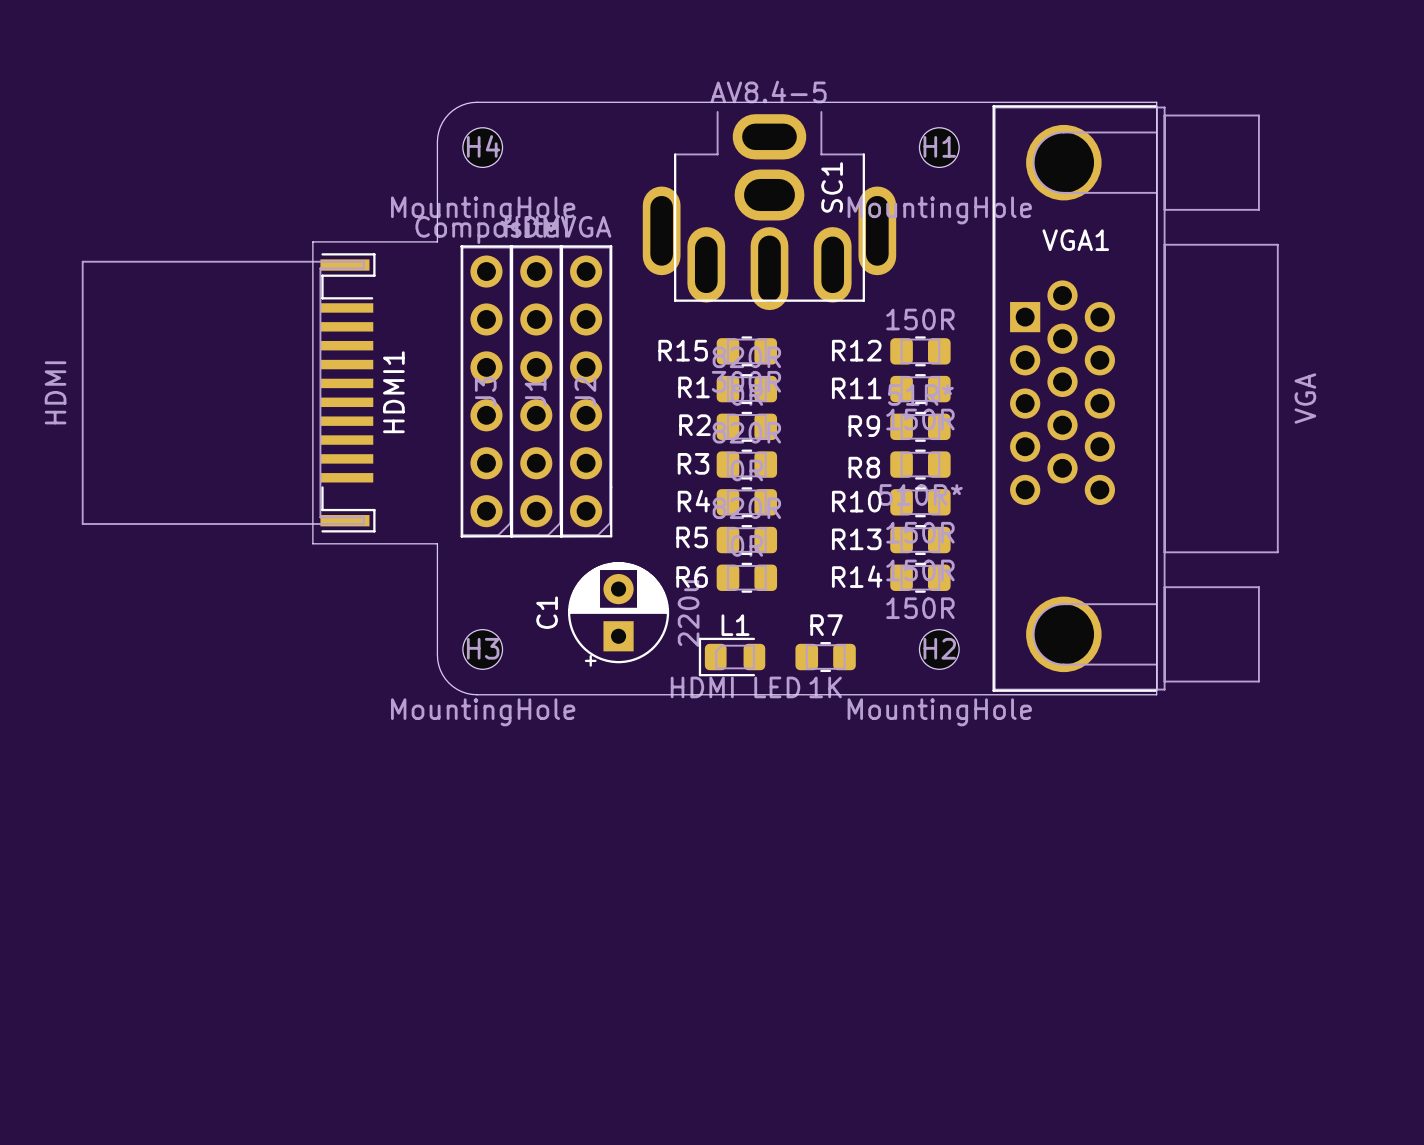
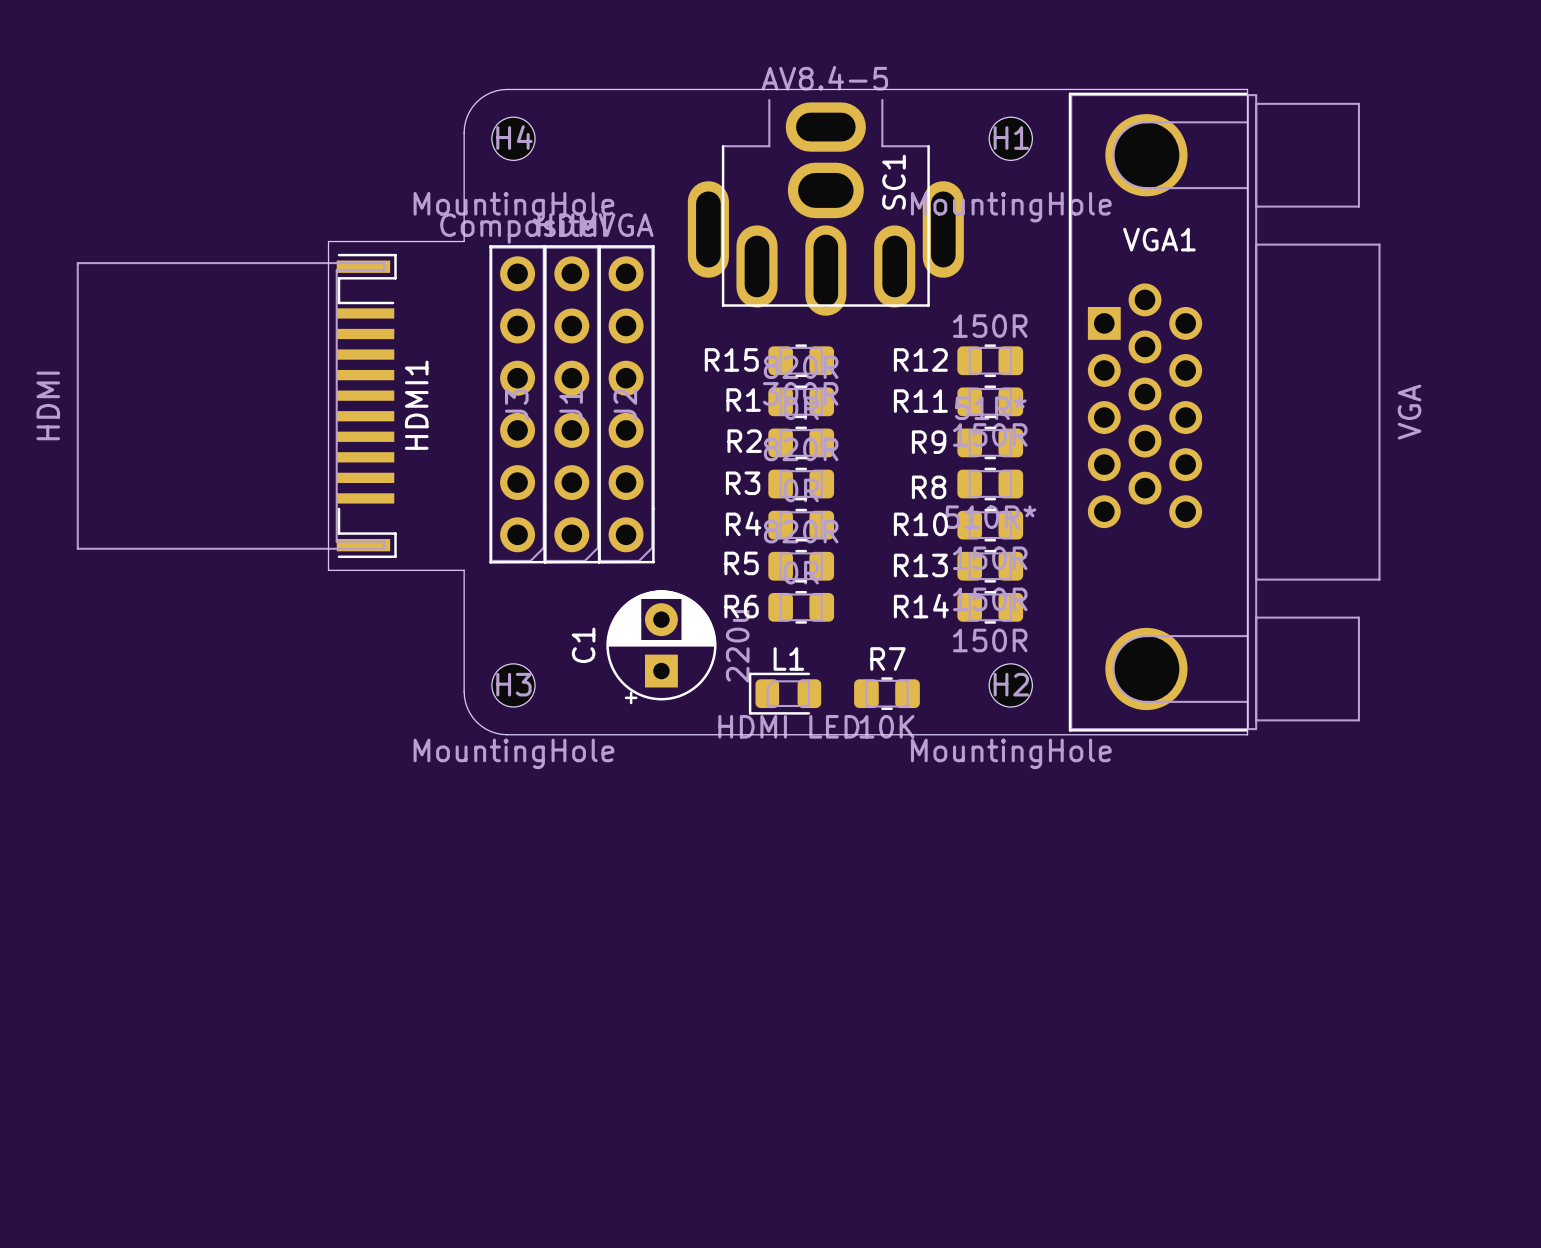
R7 value: 1K (825, 687) -> 10K (886, 726)

